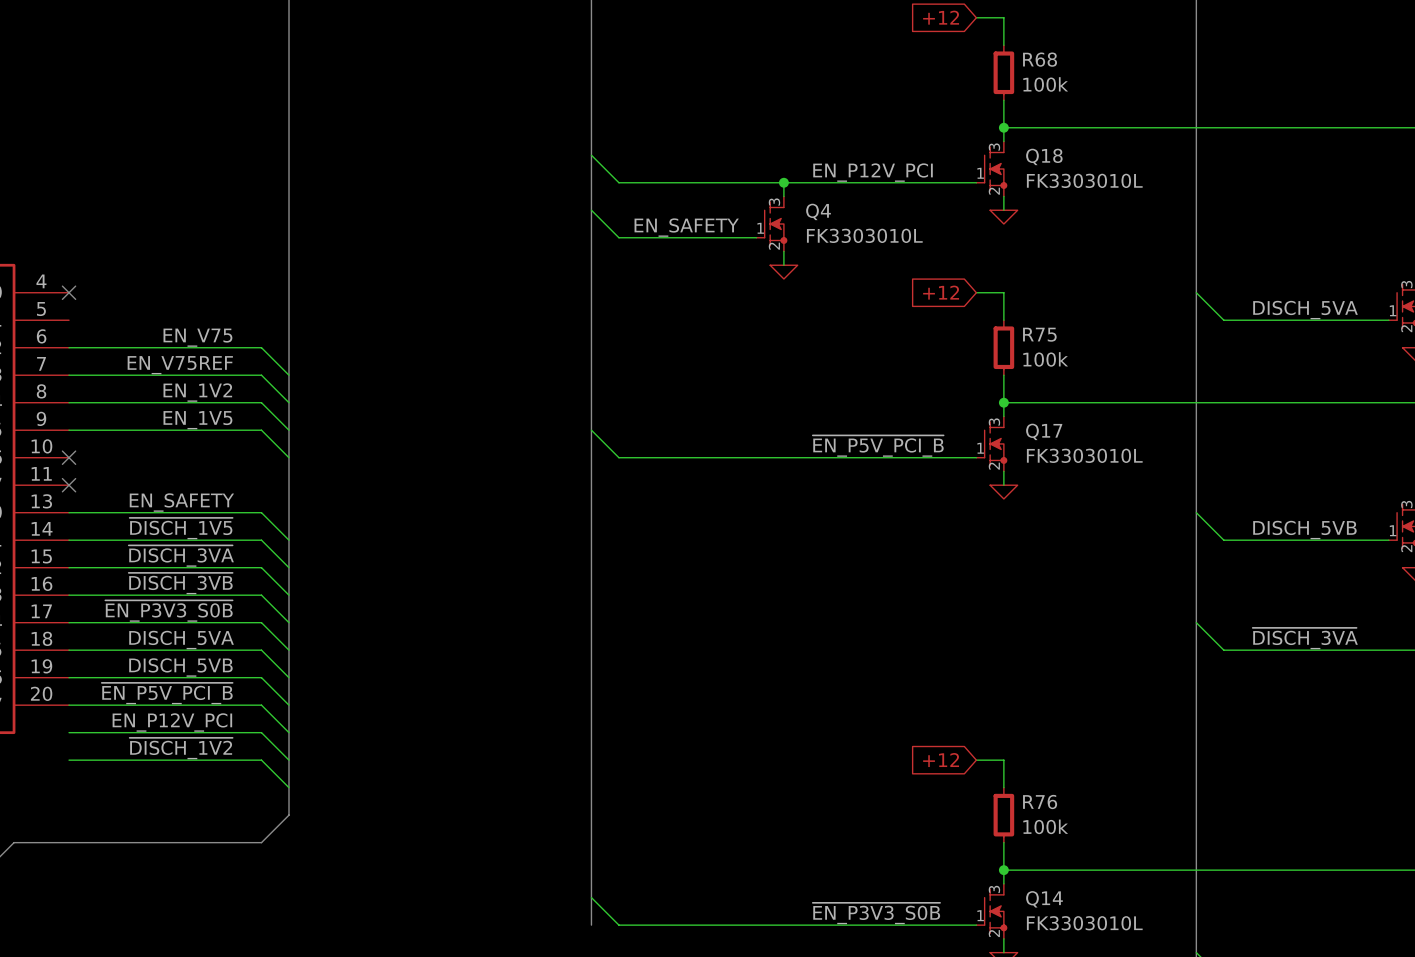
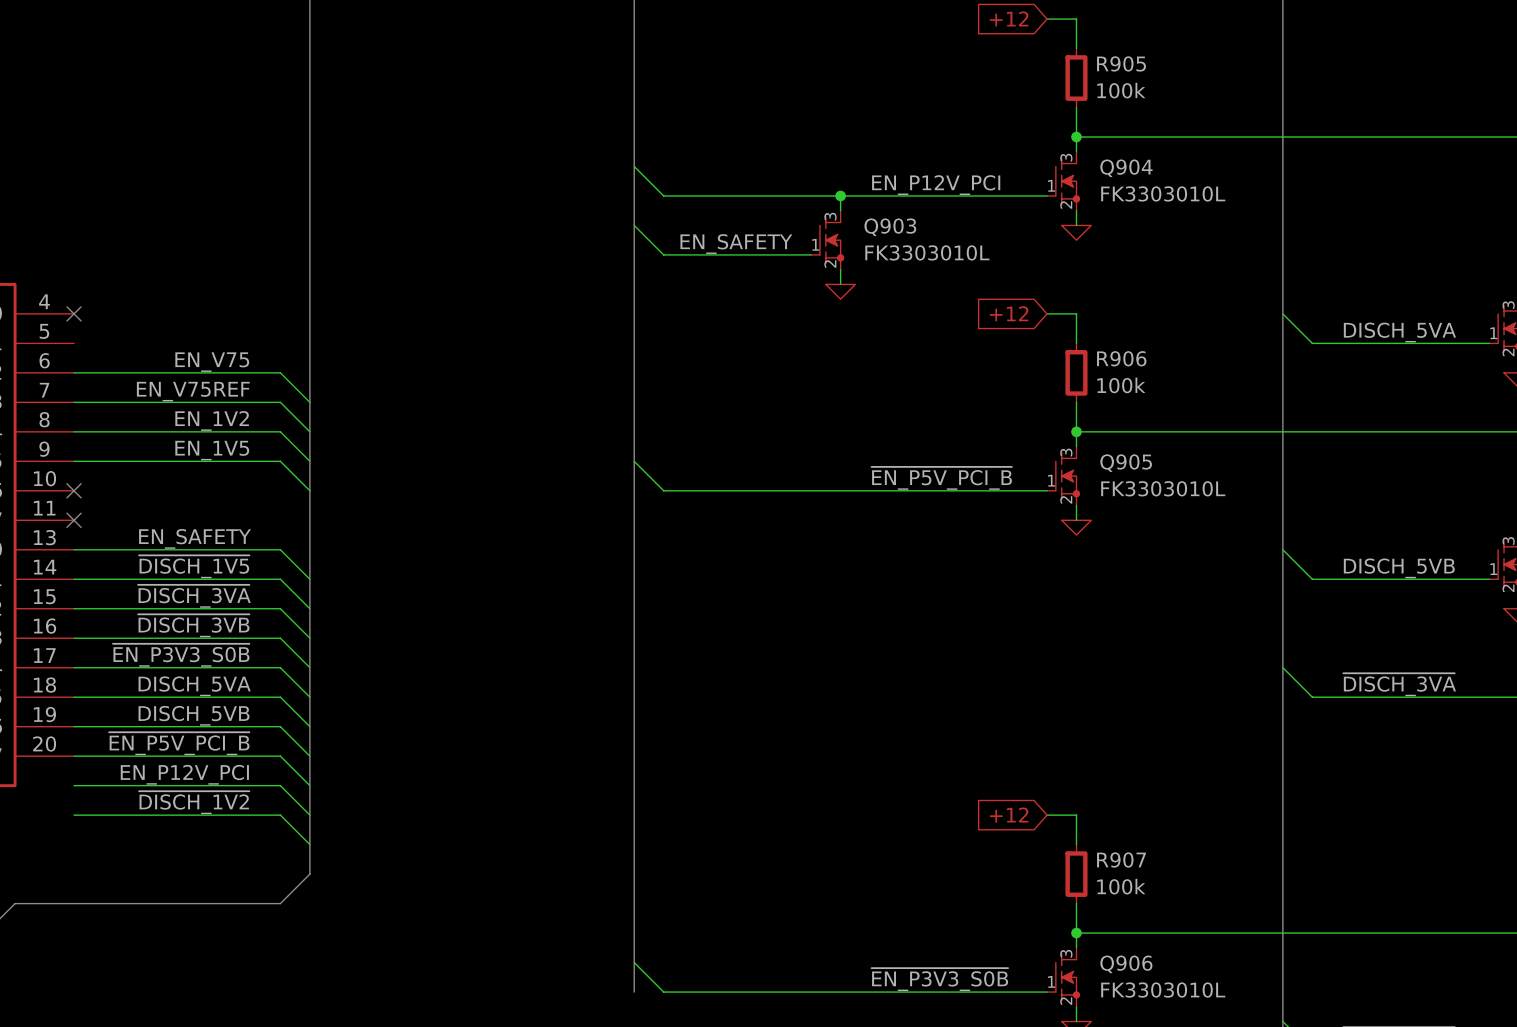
R68 name: R68 (1040, 59) -> R905 (1121, 63)
Q18 name: Q18 (1044, 156) -> Q904 (1126, 168)
Q4 name: Q4 (818, 211) -> Q903 (890, 227)
R75 name: R75 (1039, 334) -> R906 (1121, 358)
Q17 name: Q17 (1044, 431) -> Q905 (1126, 463)
R76 name: R76 (1040, 802) -> R907 (1121, 860)
Q14 name: Q14 (1044, 899) -> Q906 (1126, 964)

